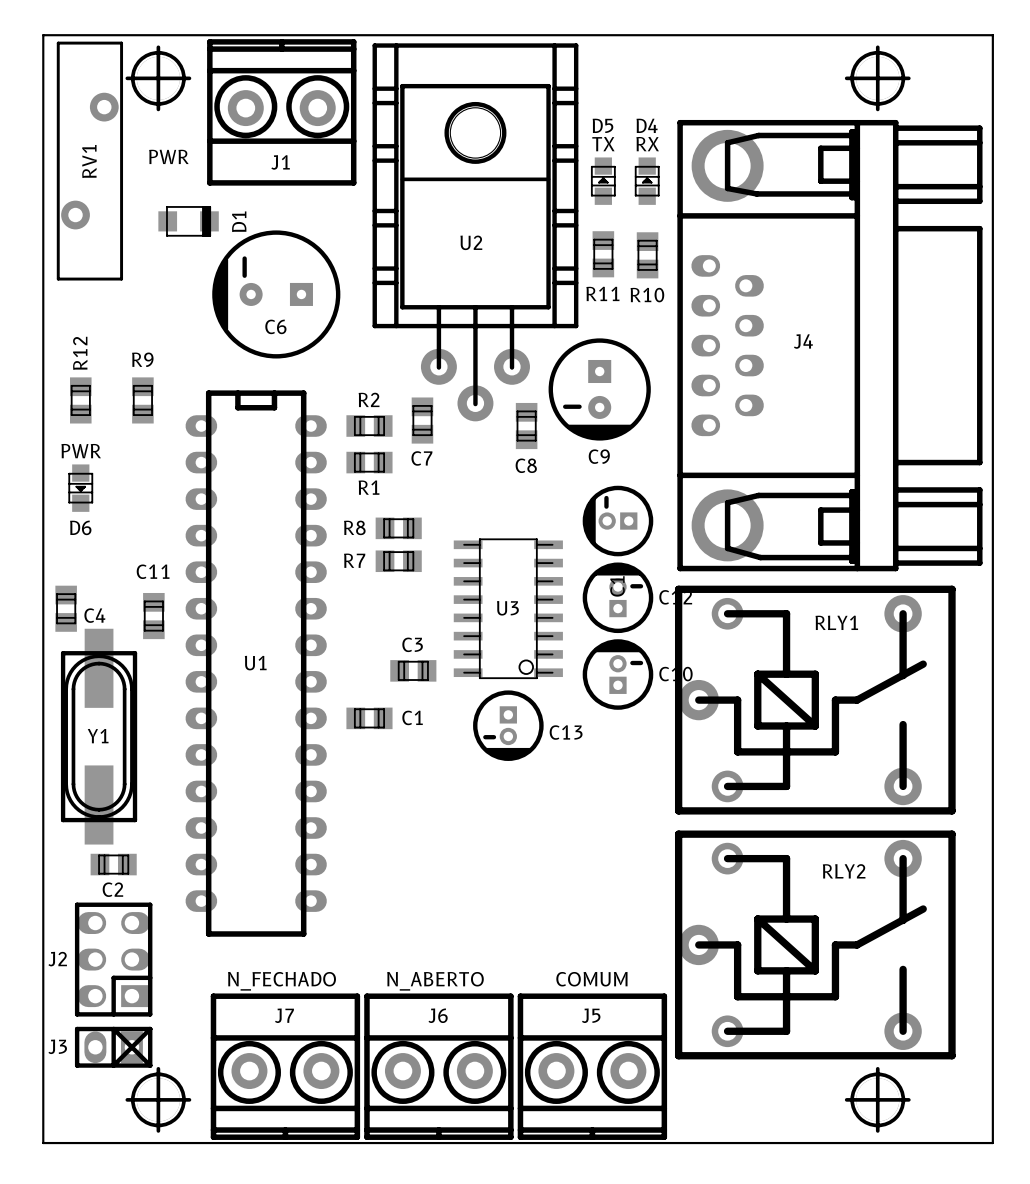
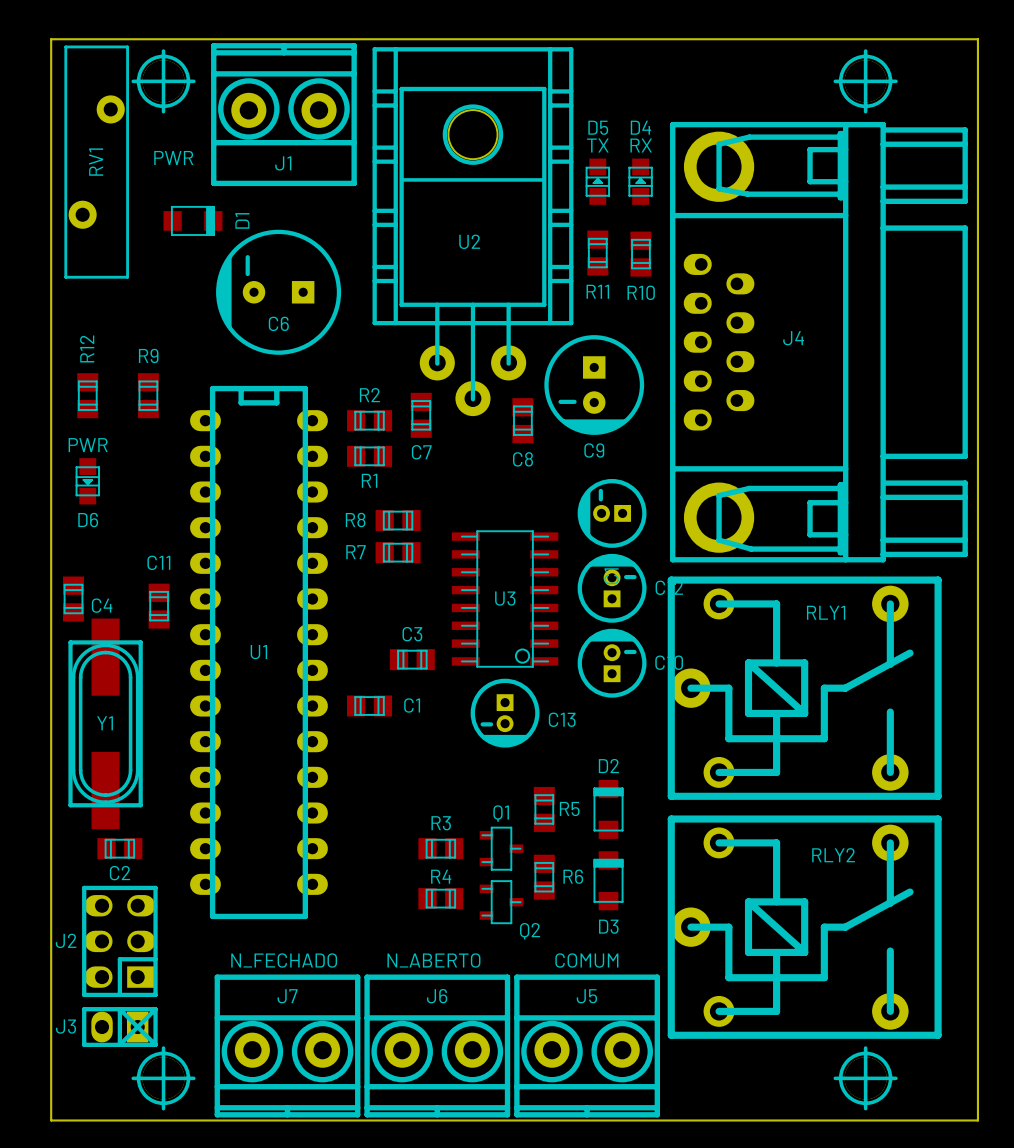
R5: none -> (544, 809)
D2: none -> (608, 809)
R3: none -> (440, 848)
Q1: none -> (501, 848)
R6: none -> (544, 877)
D3: none -> (608, 880)
R4: none -> (440, 898)
Q2: none -> (501, 902)

